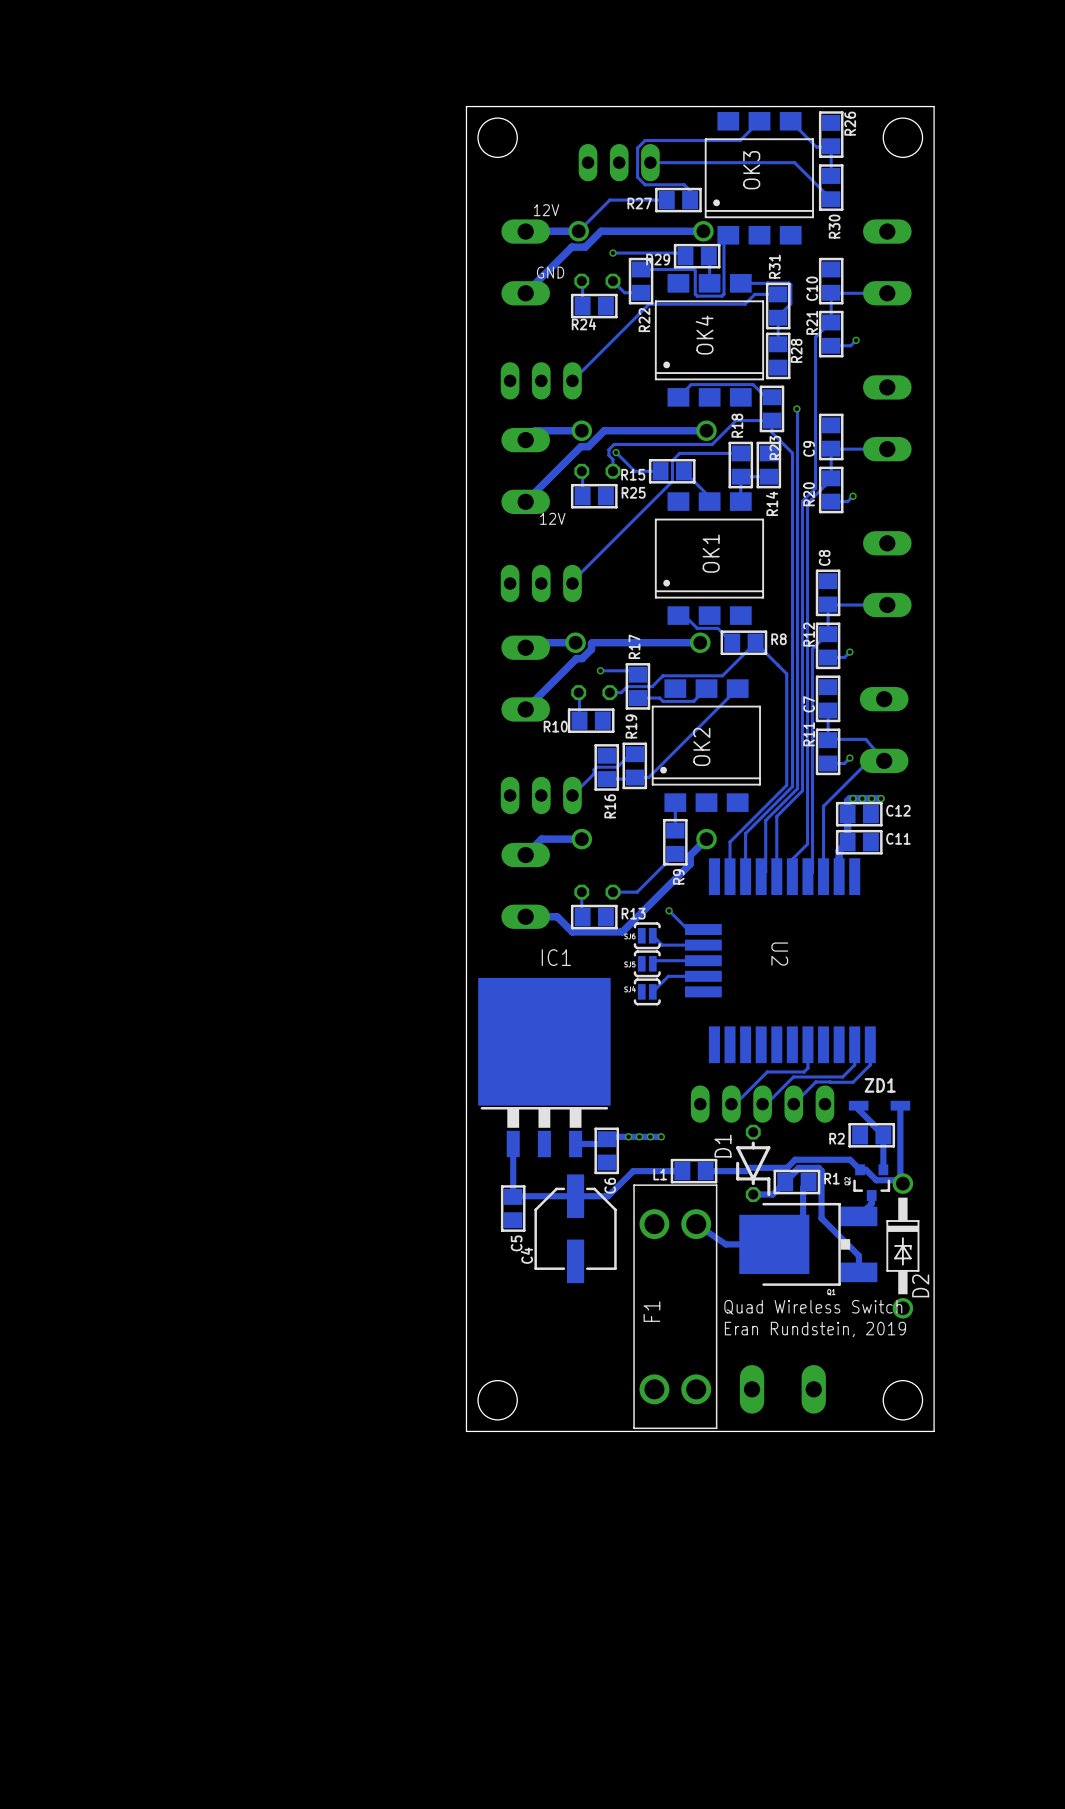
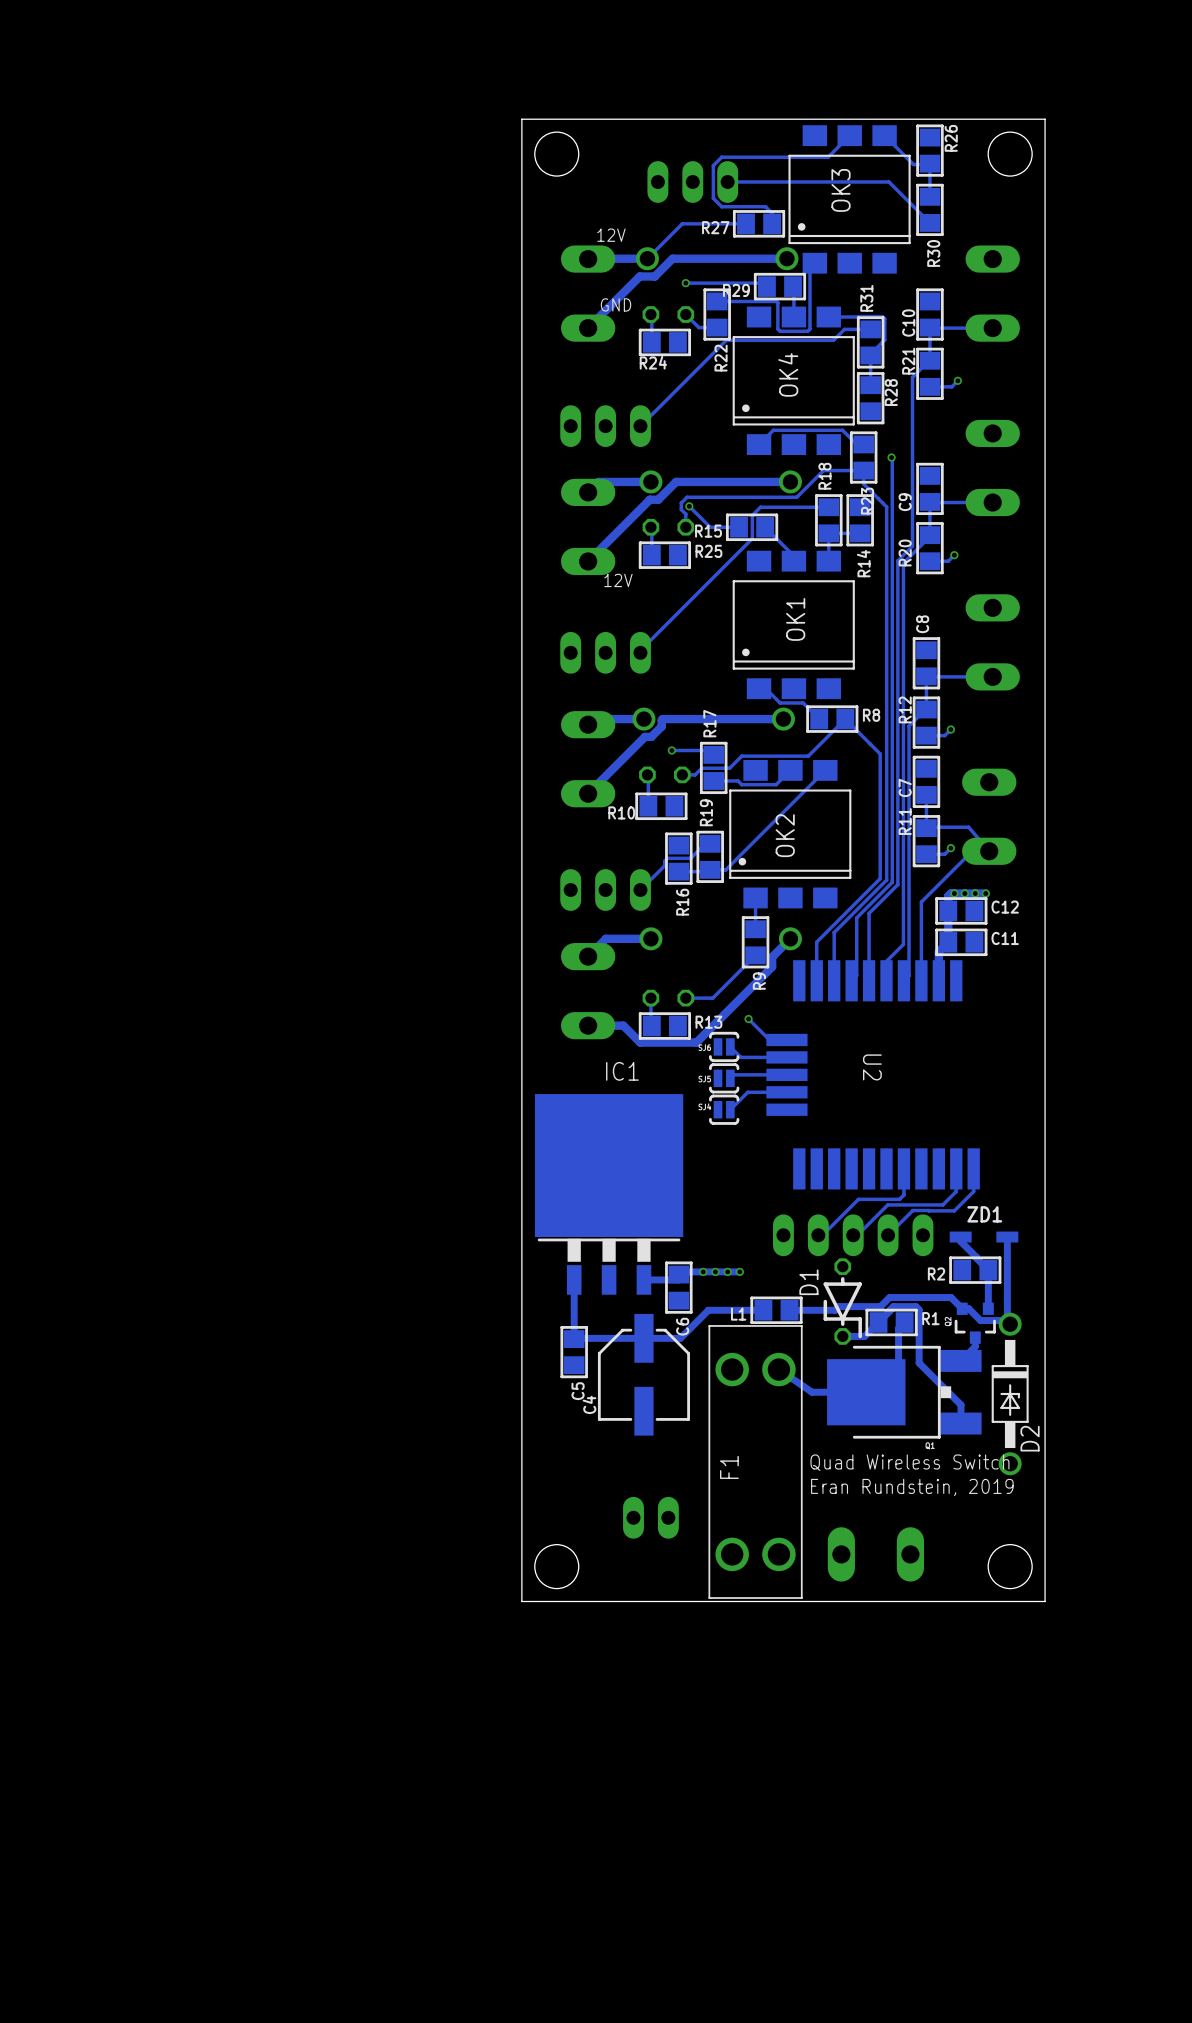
part: none -> (650, 1517)

